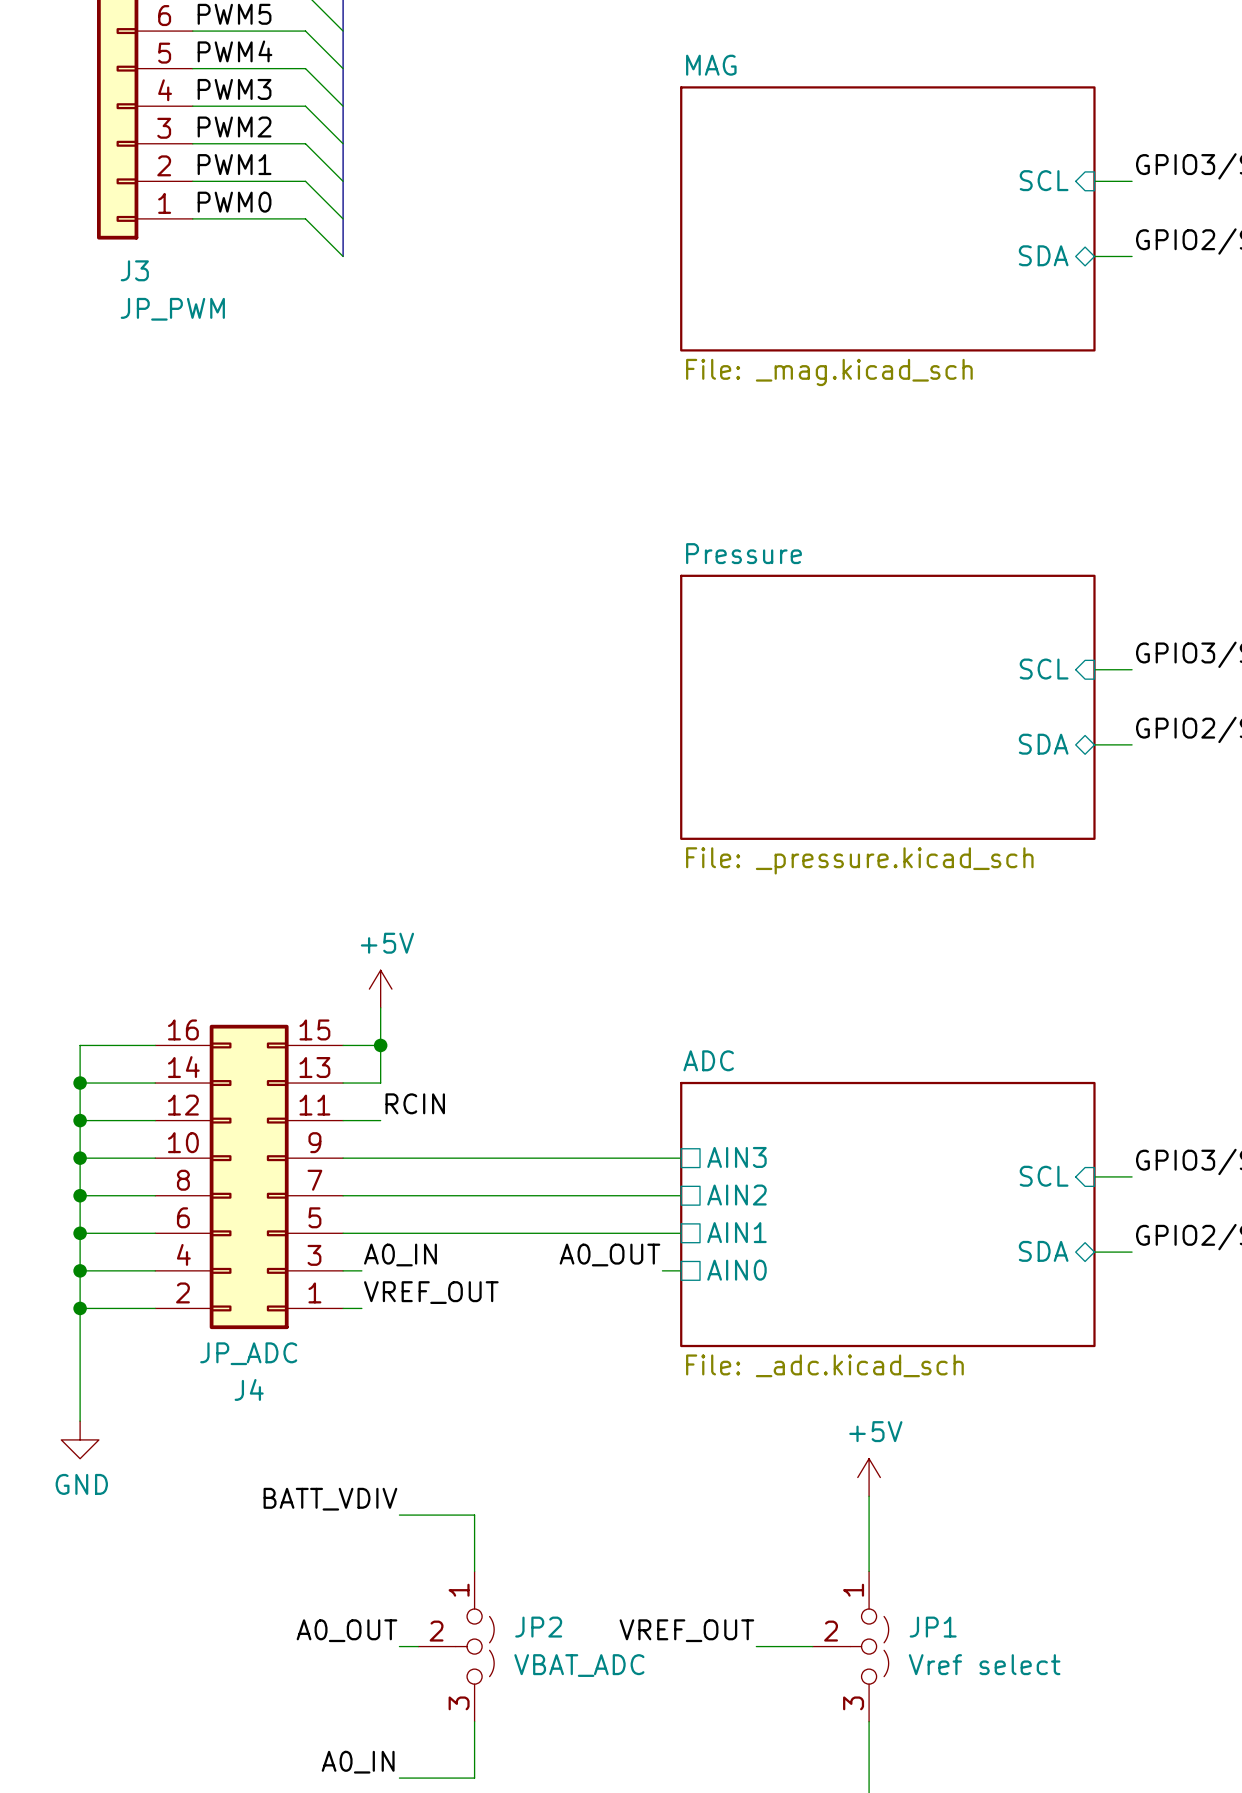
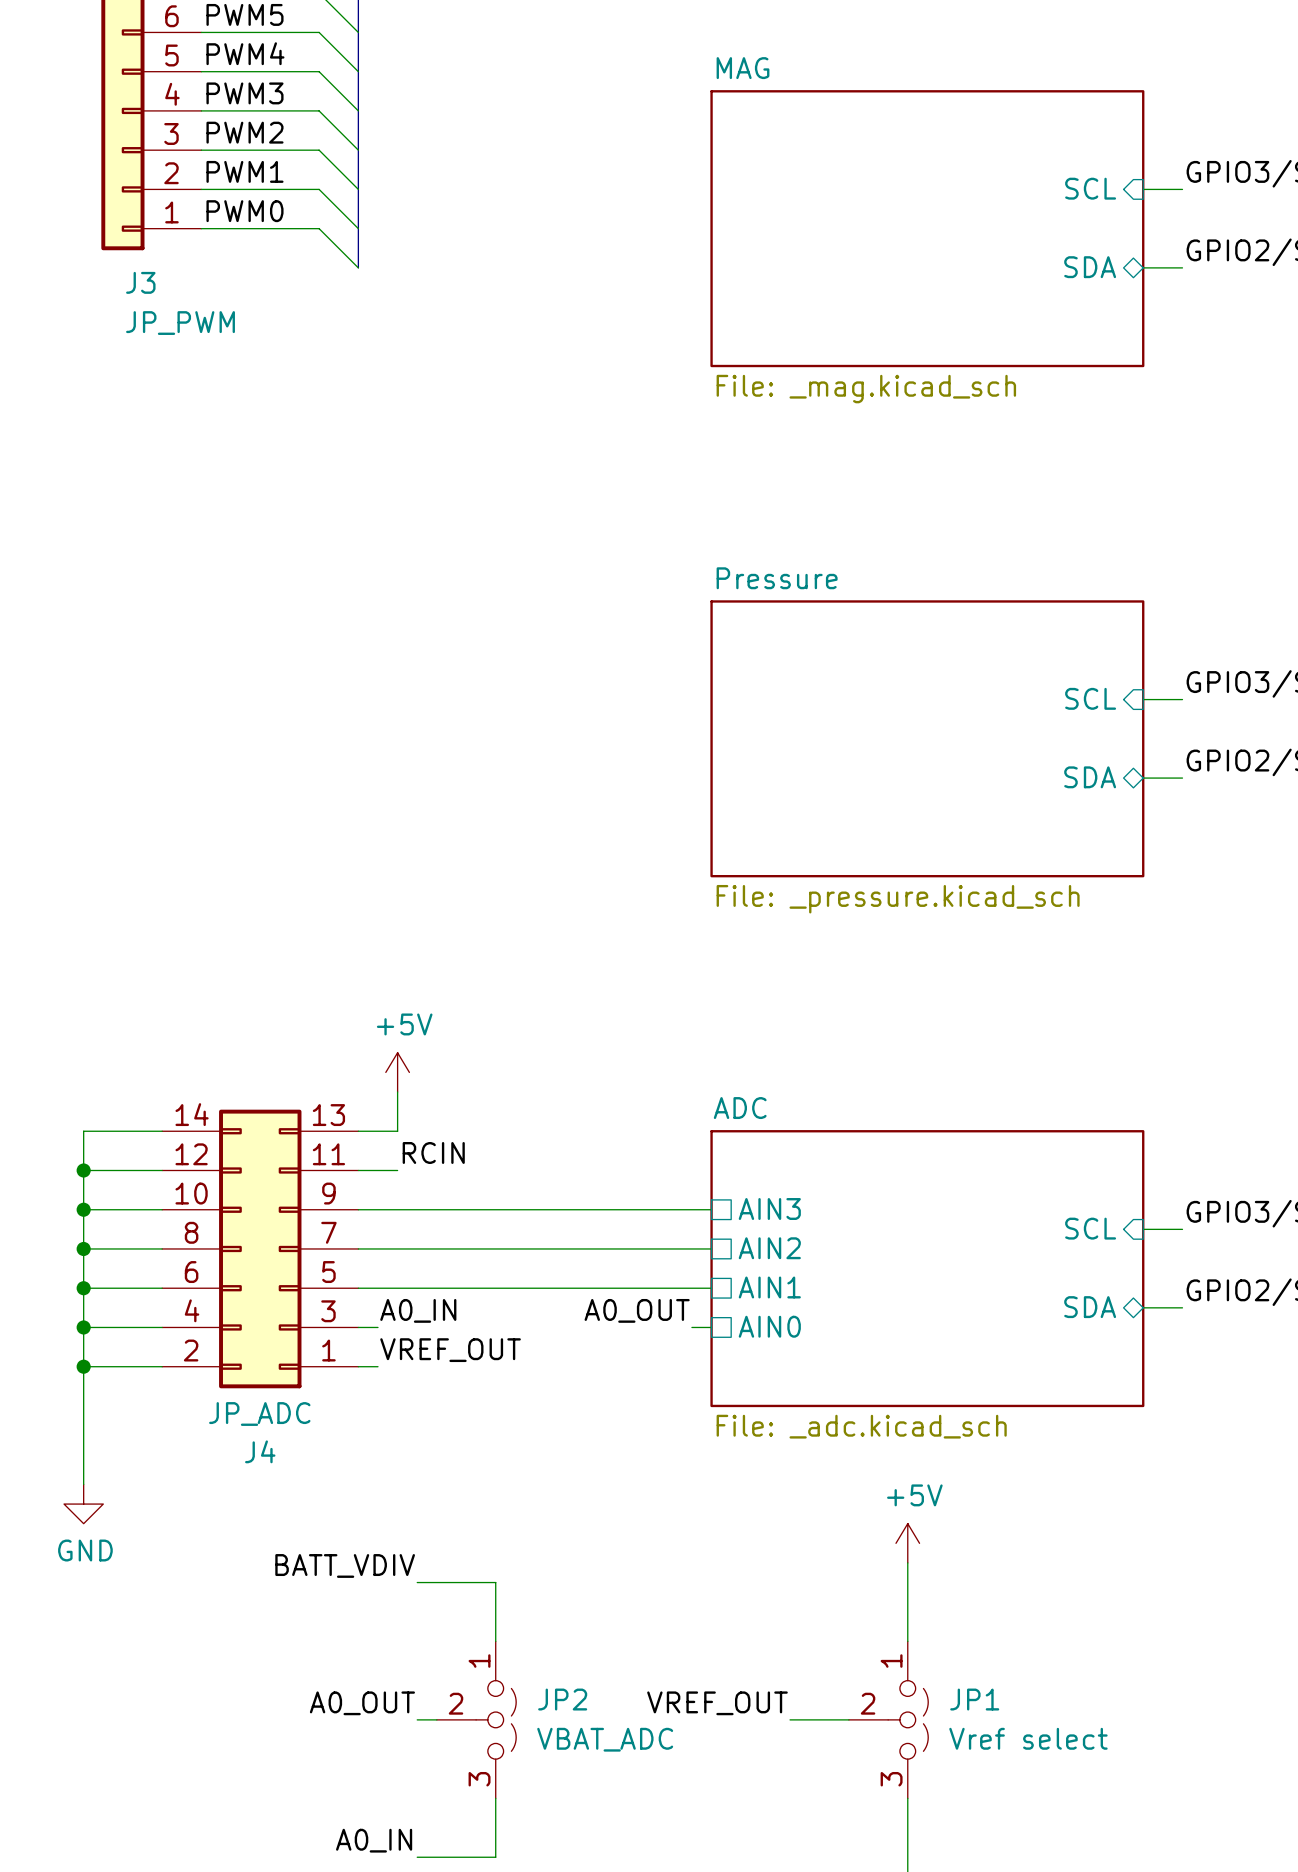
power symbol position: +5V (380, 989) -> +5V (397, 1072)
wire: (380, 1007) (380, 1045) (343, 1045) -> none
J4 symbol: [155, 1024, 344, 1330] -> [162, 1109, 359, 1389]
wire: (155, 1045) (80, 1045) (80, 1083) -> none
junction: (380, 1045) -> none
junction: (80, 1083) -> none

